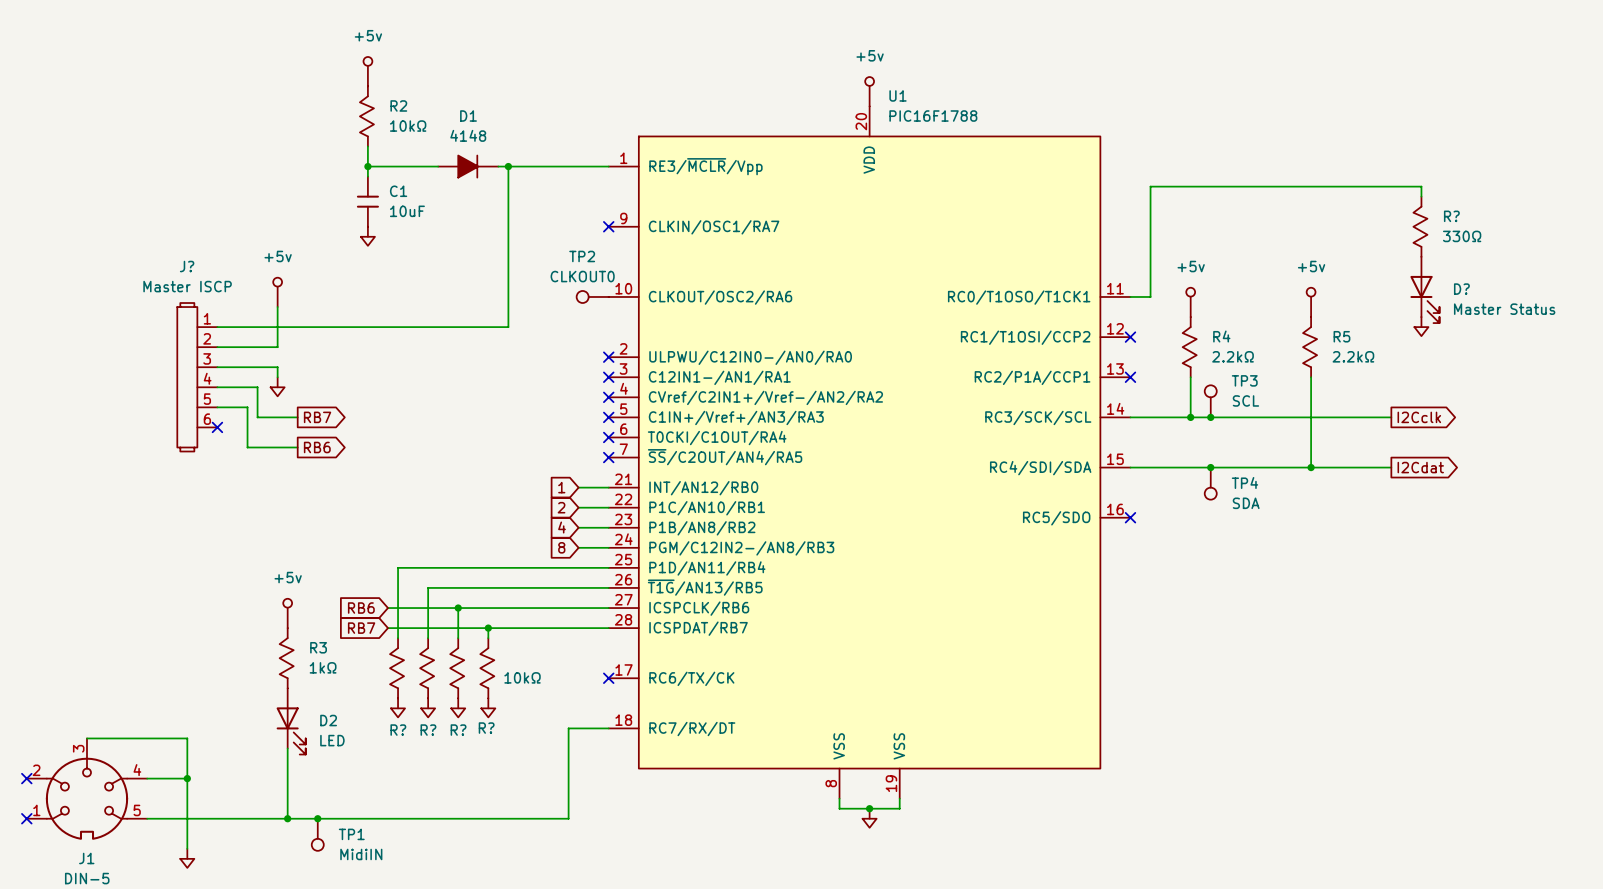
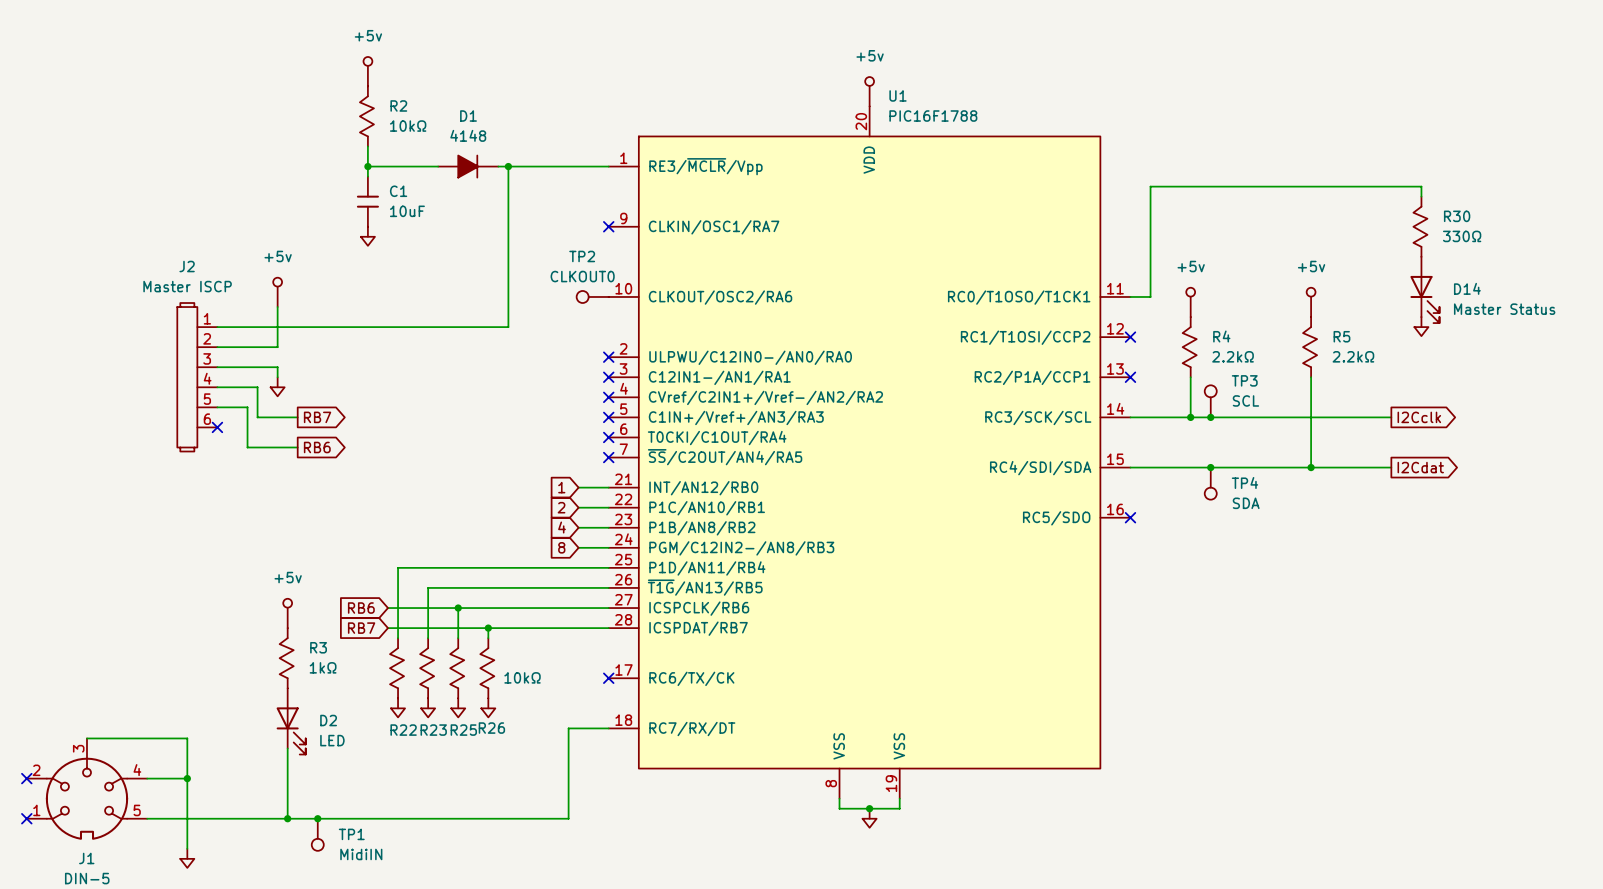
R? name: R? (1451, 216) -> R30 (1457, 216)
J? name: J? (187, 266) -> J2 (187, 266)
D? name: D? (1461, 289) -> D14 (1467, 288)
R? name: R? (486, 728) -> R26 (491, 728)
R? name: R? (398, 730) -> R22 (403, 730)
R? name: R? (428, 730) -> R23 (433, 730)
R? name: R? (458, 730) -> R25 (463, 730)

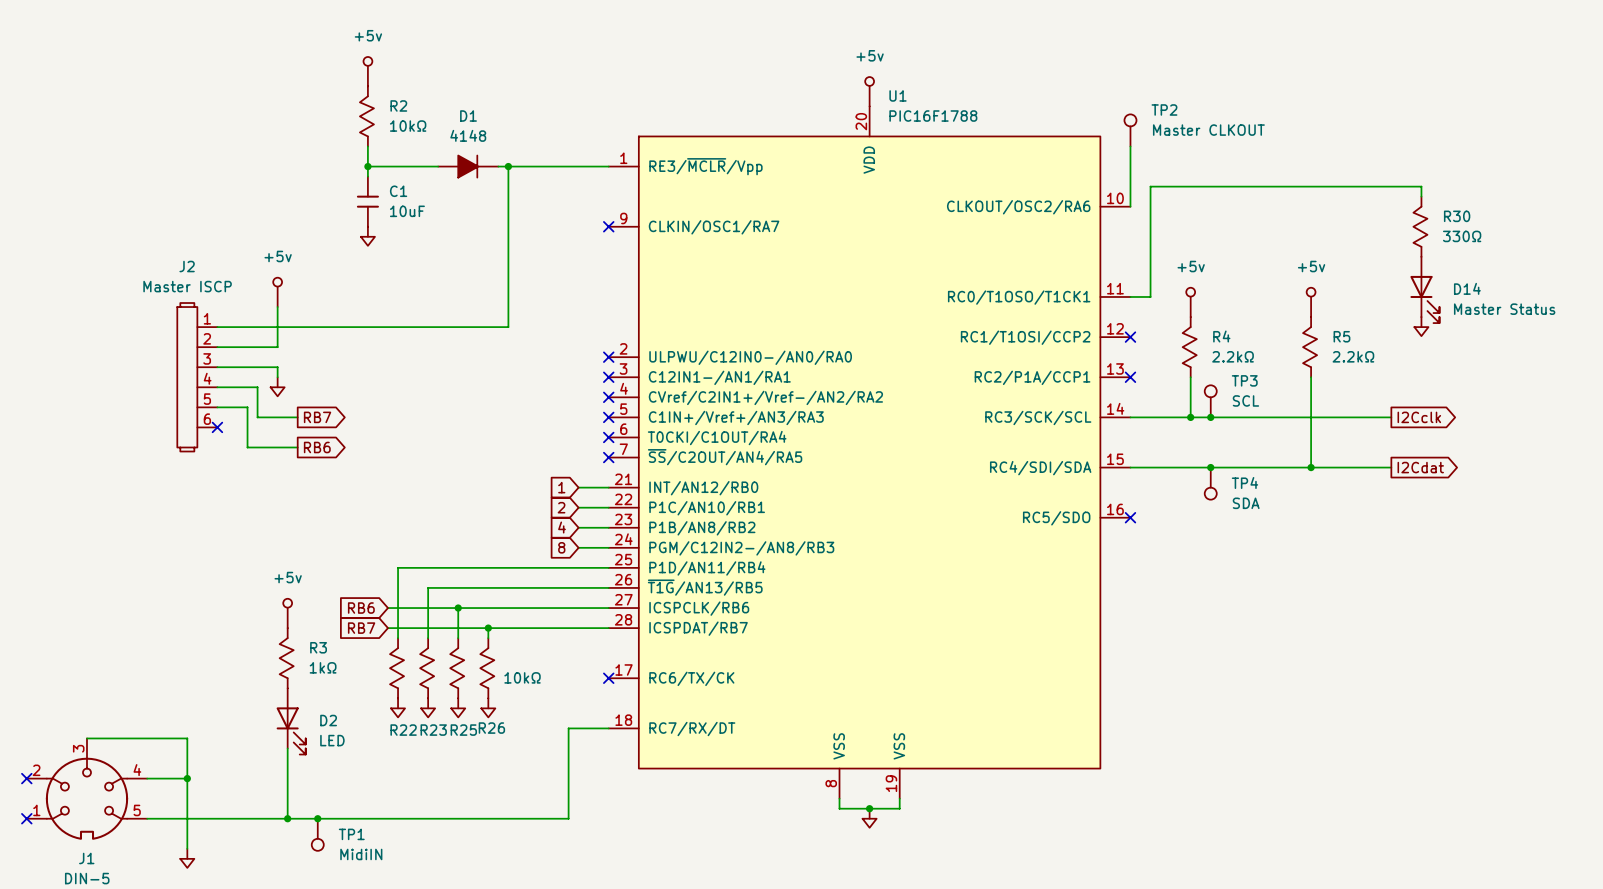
U1 symbol: [608, 106, 1131, 799] -> [608, 106, 1131, 799]
wire: none -> (1130, 146) (1130, 206)
TP2 value: CLKOUT0 (582, 276) -> Master CLKOUT (1208, 130)
TP2 rotation: 0° (582, 296) -> 90° clockwise (1130, 120)
TP2 position: (592, 296) -> (1130, 130)

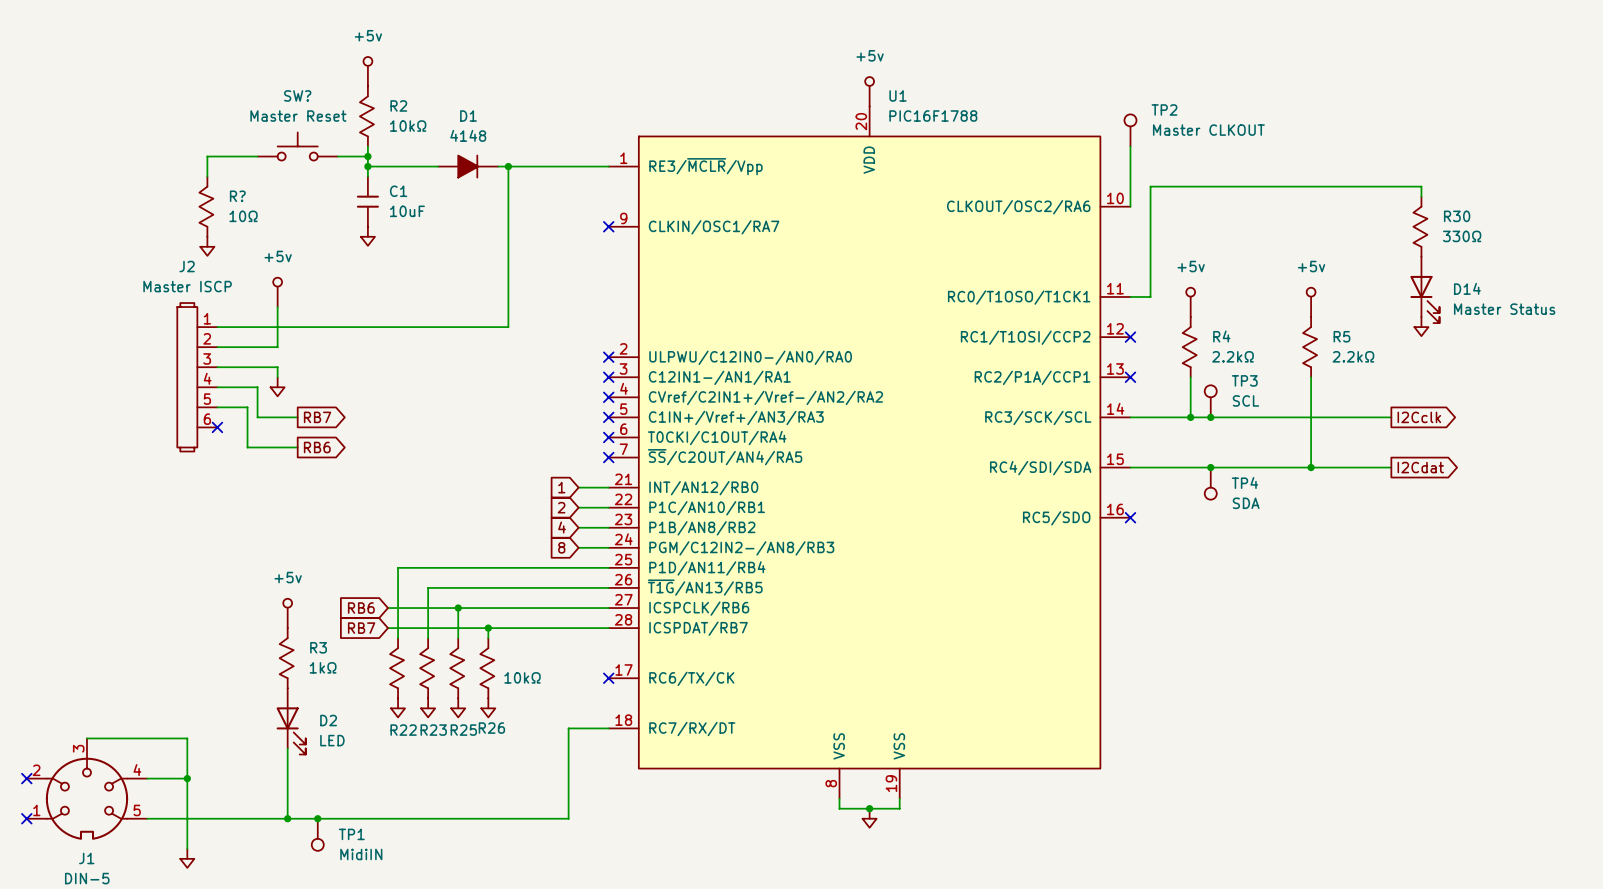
SW?: none -> Master Reset (297, 146)
wire: none -> (257, 156) (207, 156) (207, 176)
wire: none -> (337, 156) (367, 156)
junction: none -> (367, 156)
R?: none -> 10Ω (206, 206)
power symbol: none -> (207, 246)

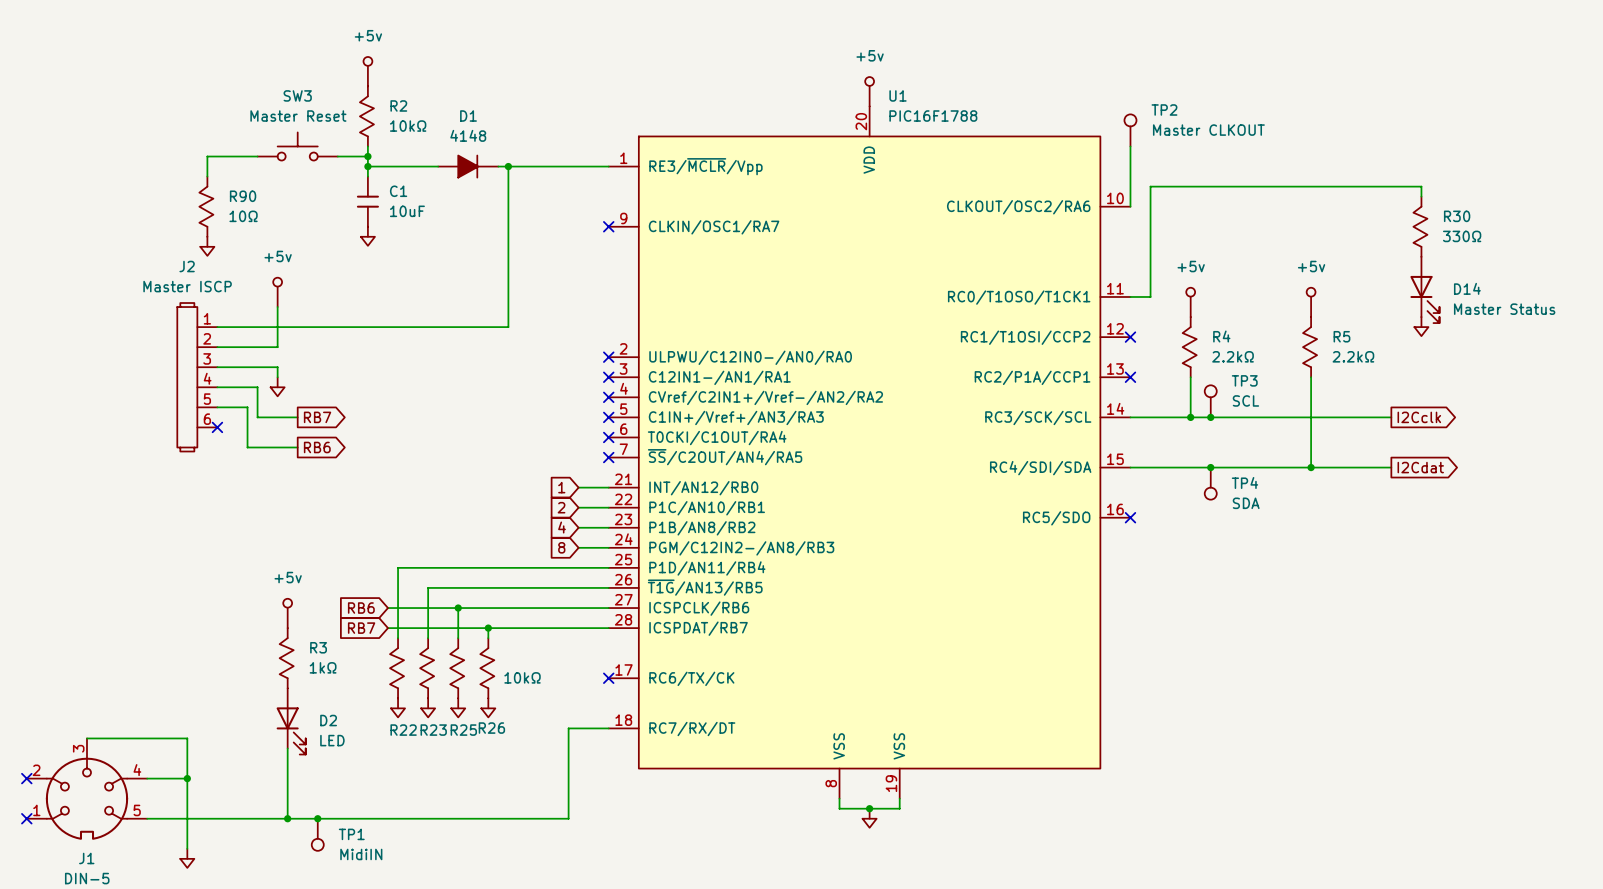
SW? name: SW? (297, 95) -> SW3 (297, 95)
R? name: R? (237, 196) -> R90 (243, 196)

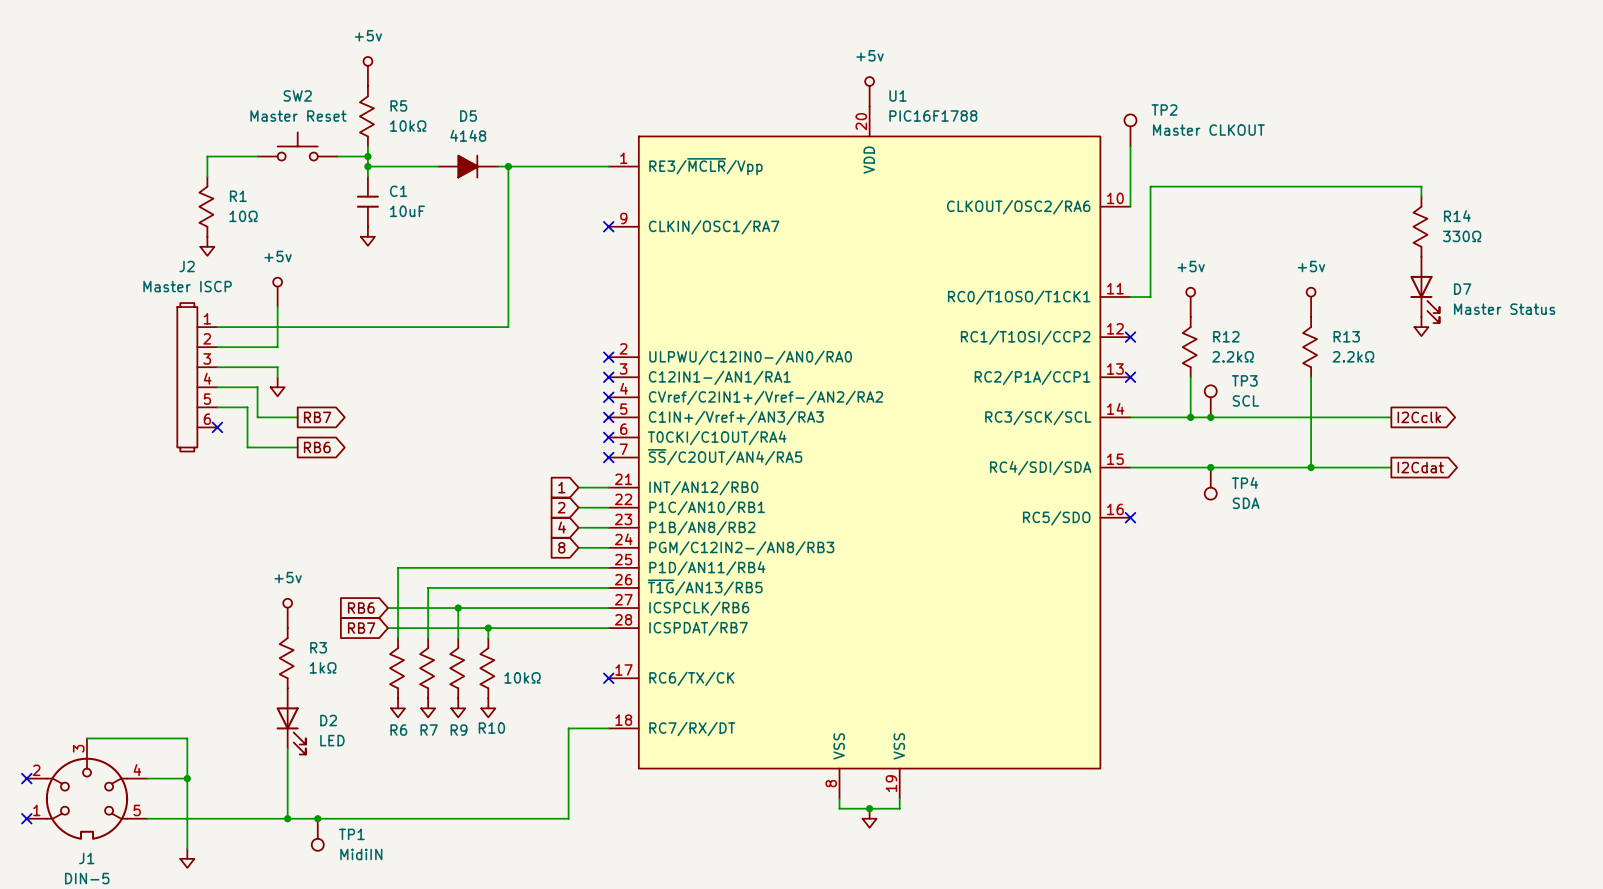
SW3 name: SW3 (297, 95) -> SW2 (297, 95)
R2 name: R2 (398, 105) -> R5 (398, 105)
D1 name: D1 (468, 116) -> D5 (468, 116)
R90 name: R90 (243, 196) -> R1 (238, 196)
R30 name: R30 (1457, 216) -> R14 (1457, 216)
D14 name: D14 (1467, 288) -> D7 (1462, 289)
R4 name: R4 (1221, 336) -> R12 (1226, 336)
R5 name: R5 (1341, 336) -> R13 (1346, 336)
R26 name: R26 (491, 728) -> R10 (491, 728)
R22 name: R22 (403, 730) -> R6 (398, 730)
R23 name: R23 (433, 730) -> R7 (429, 730)
R25 name: R25 (463, 730) -> R9 (459, 730)

